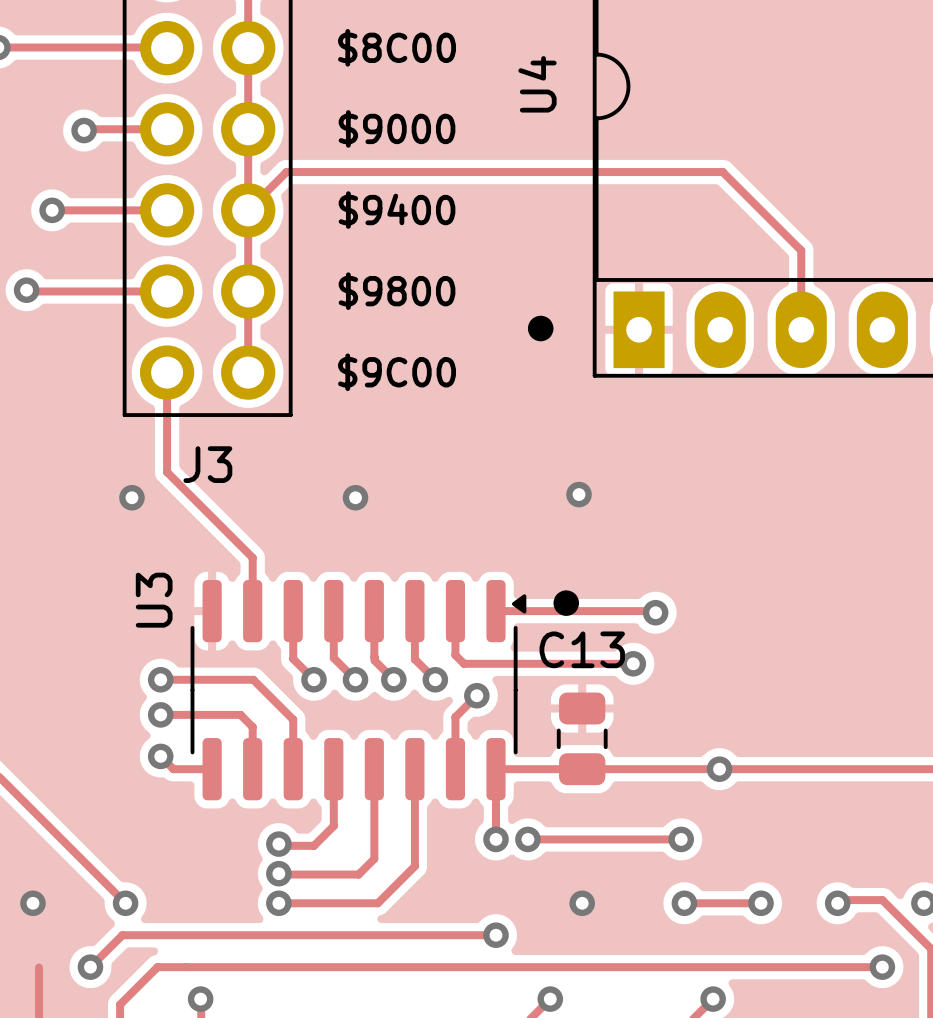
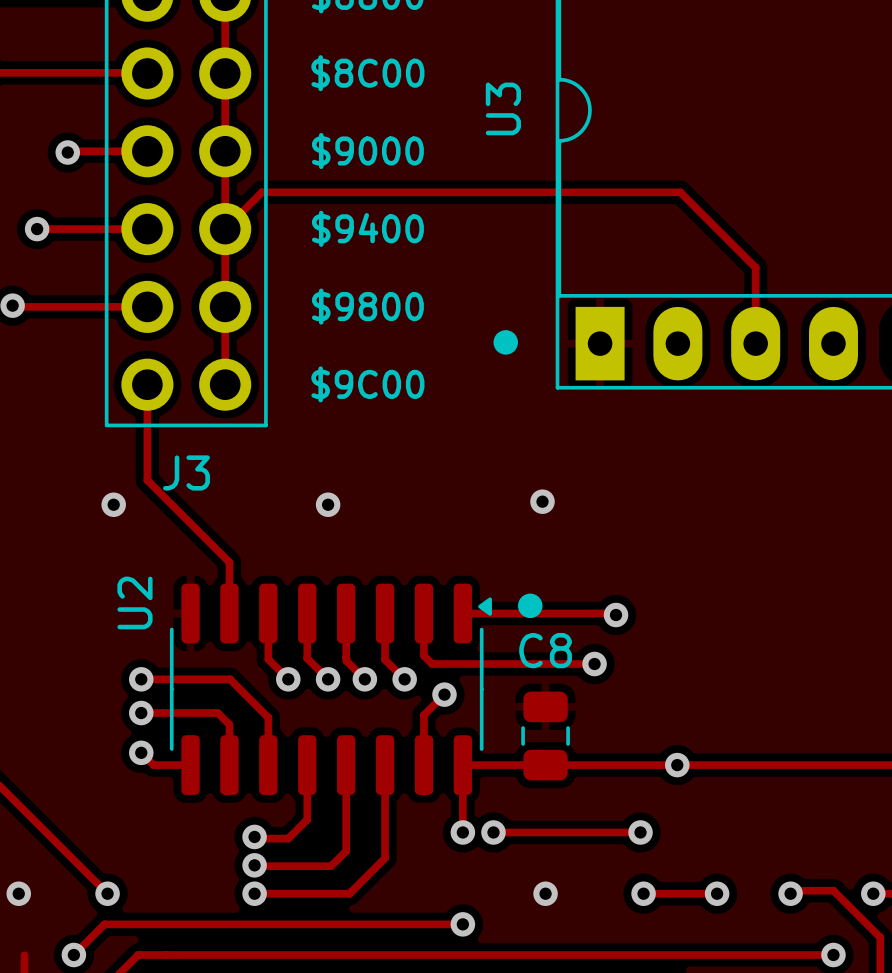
U4 name: U4 (537, 84) -> U3 (503, 108)
U3 name: U3 (154, 600) -> U2 (134, 602)
C13 name: C13 (582, 649) -> C8 (545, 650)

